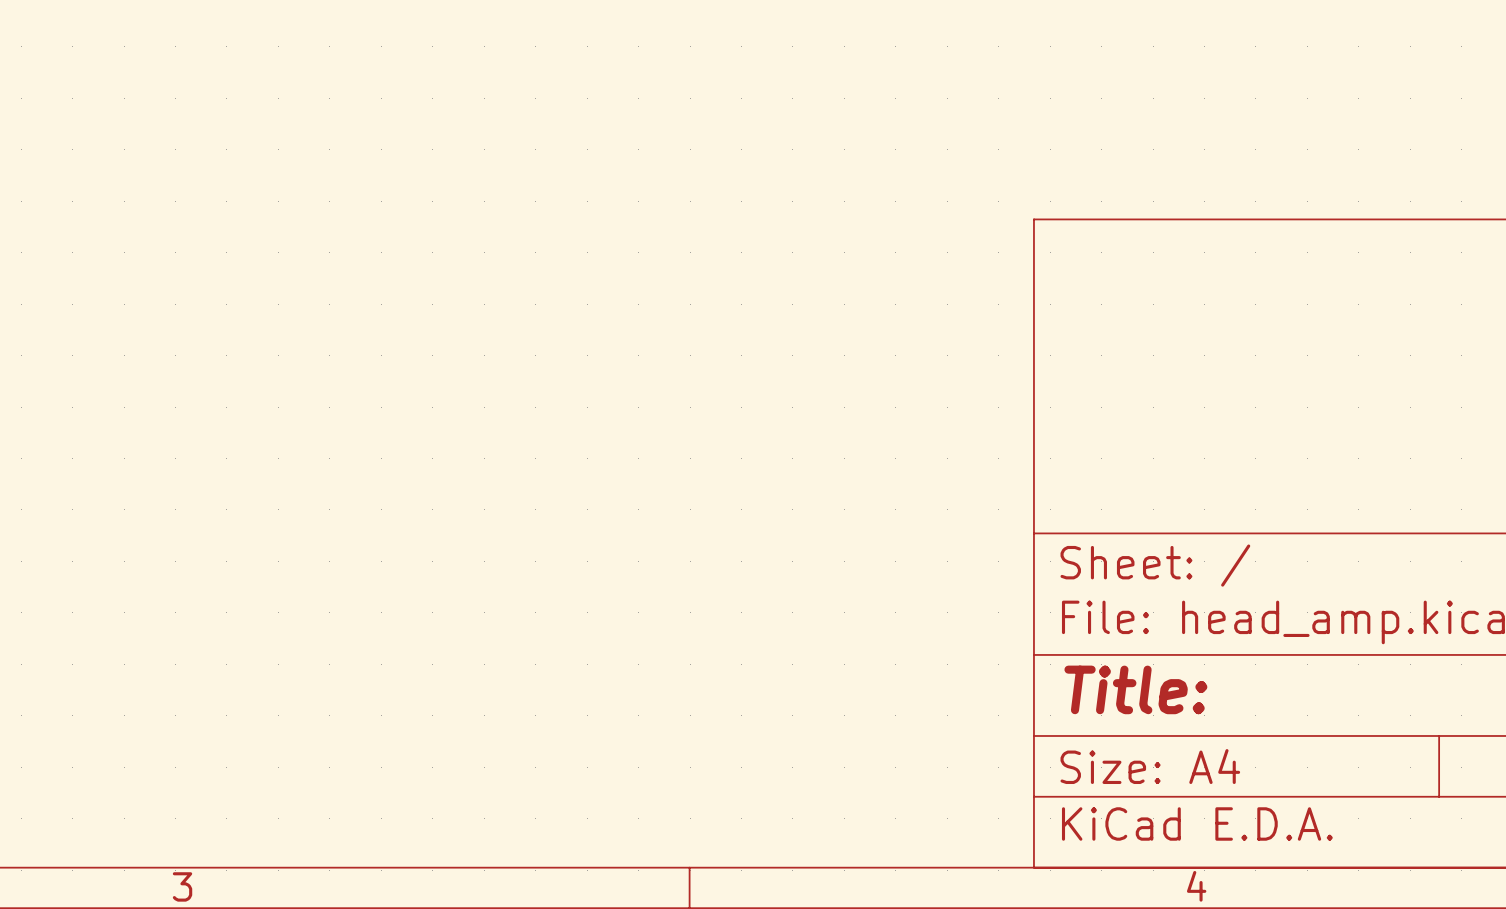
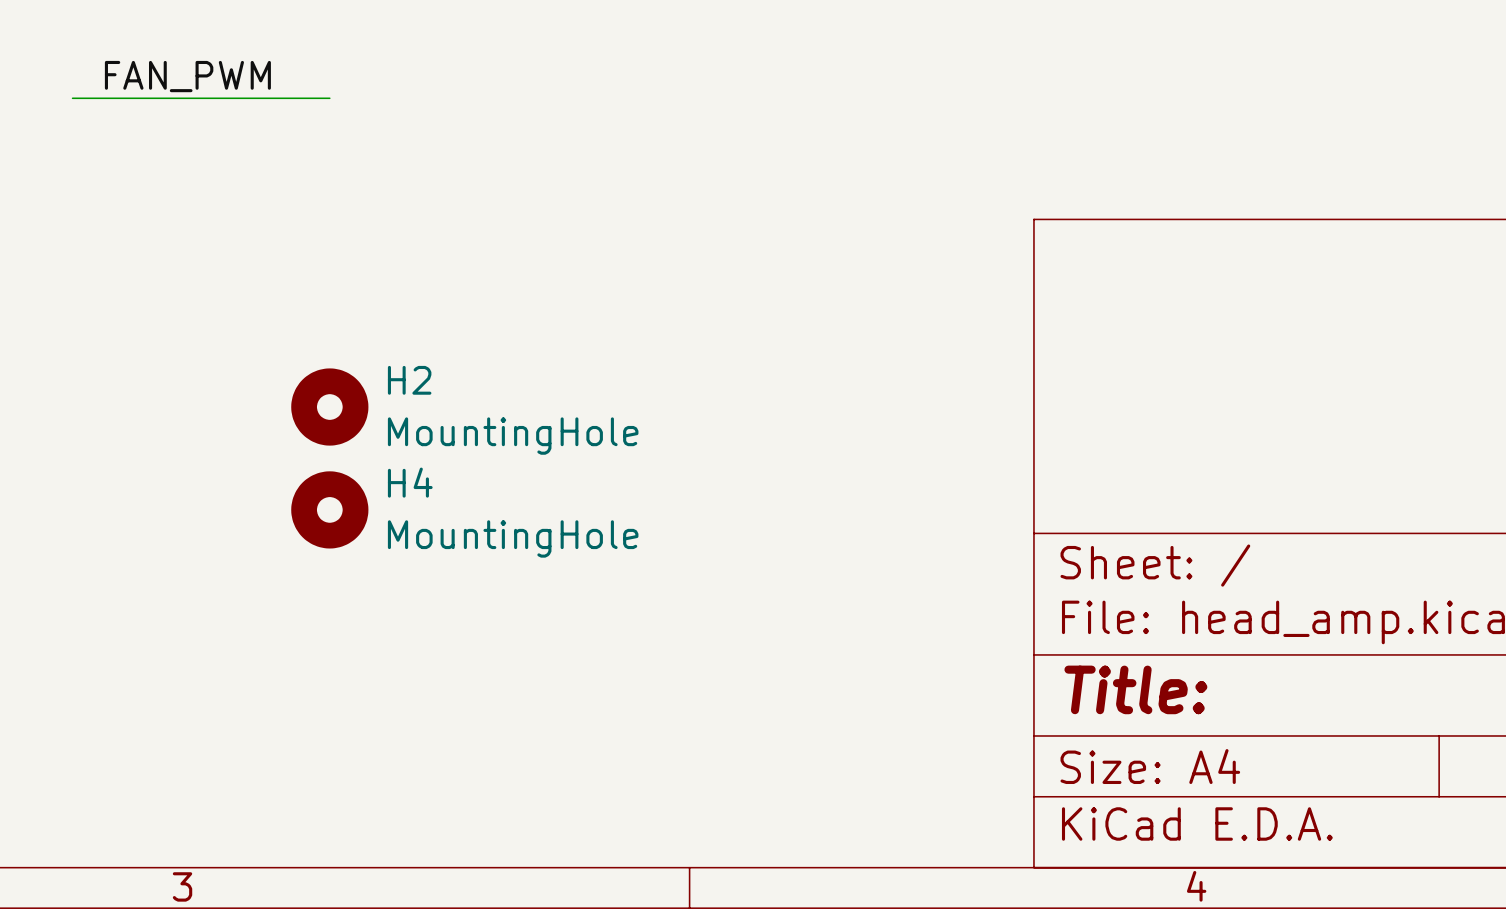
label: none -> FAN_PWM (187, 76)
wire: none -> (72, 98) (329, 98)
H2: none -> MountingHole (329, 407)
H4: none -> MountingHole (329, 509)

